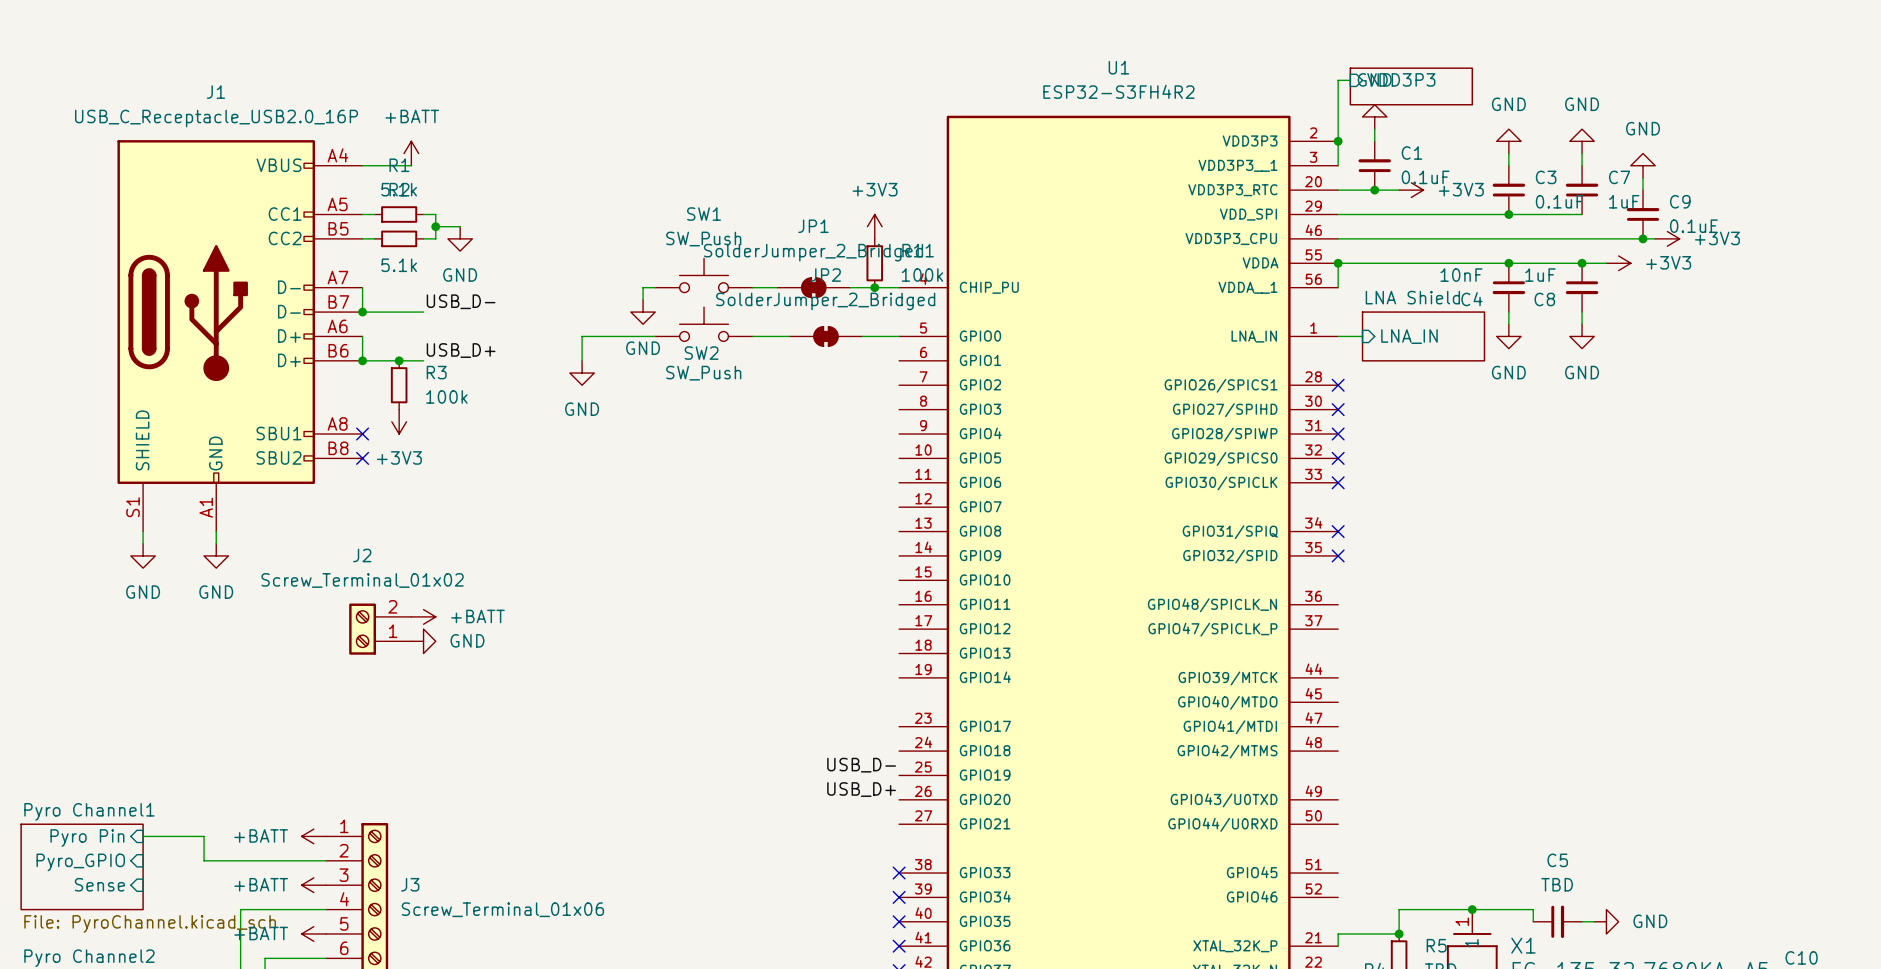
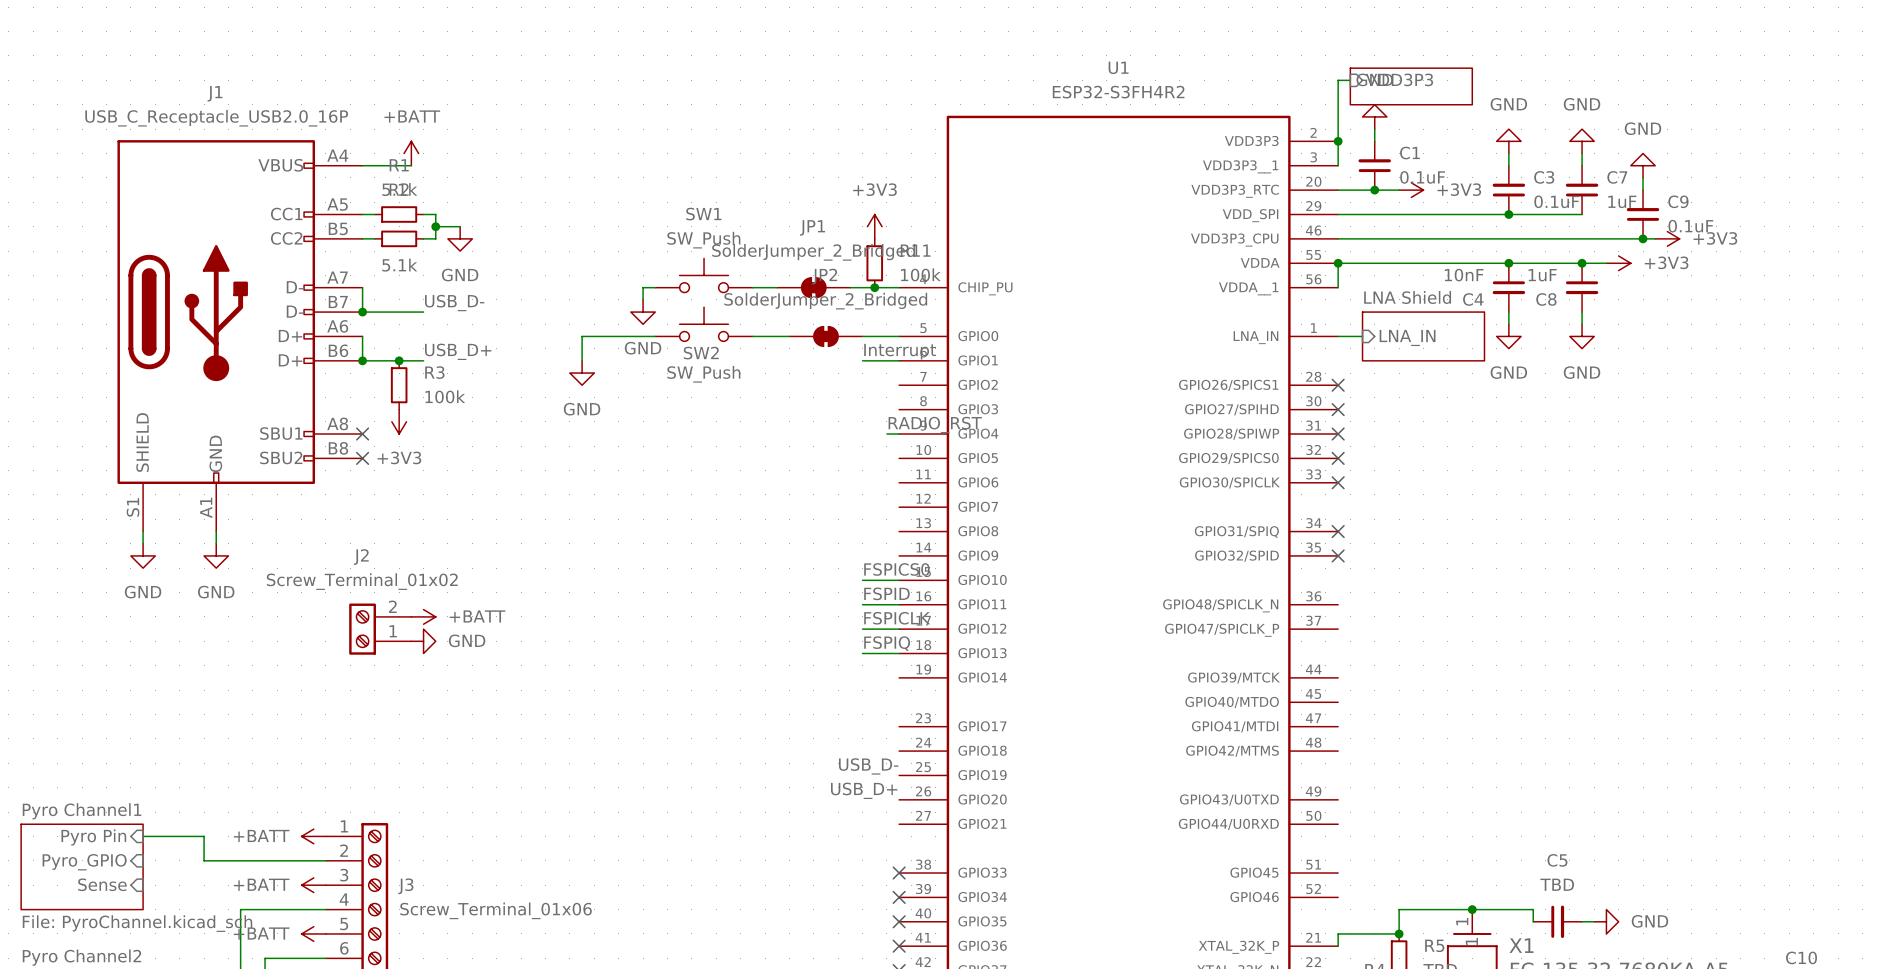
label: none -> Interrupt (900, 351)
wire: none -> (862, 360) (899, 360)
label: none -> RADIO_RST (935, 424)
wire: none -> (886, 434) (899, 434)
label: none -> FSPICS0 (896, 569)
wire: none -> (862, 580) (899, 580)
label: none -> FSPID (886, 593)
wire: none -> (862, 604) (899, 604)
label: none -> FSPICLK (897, 618)
wire: none -> (862, 629) (899, 629)
label: none -> FSPIQ (887, 643)
wire: none -> (862, 653) (899, 653)

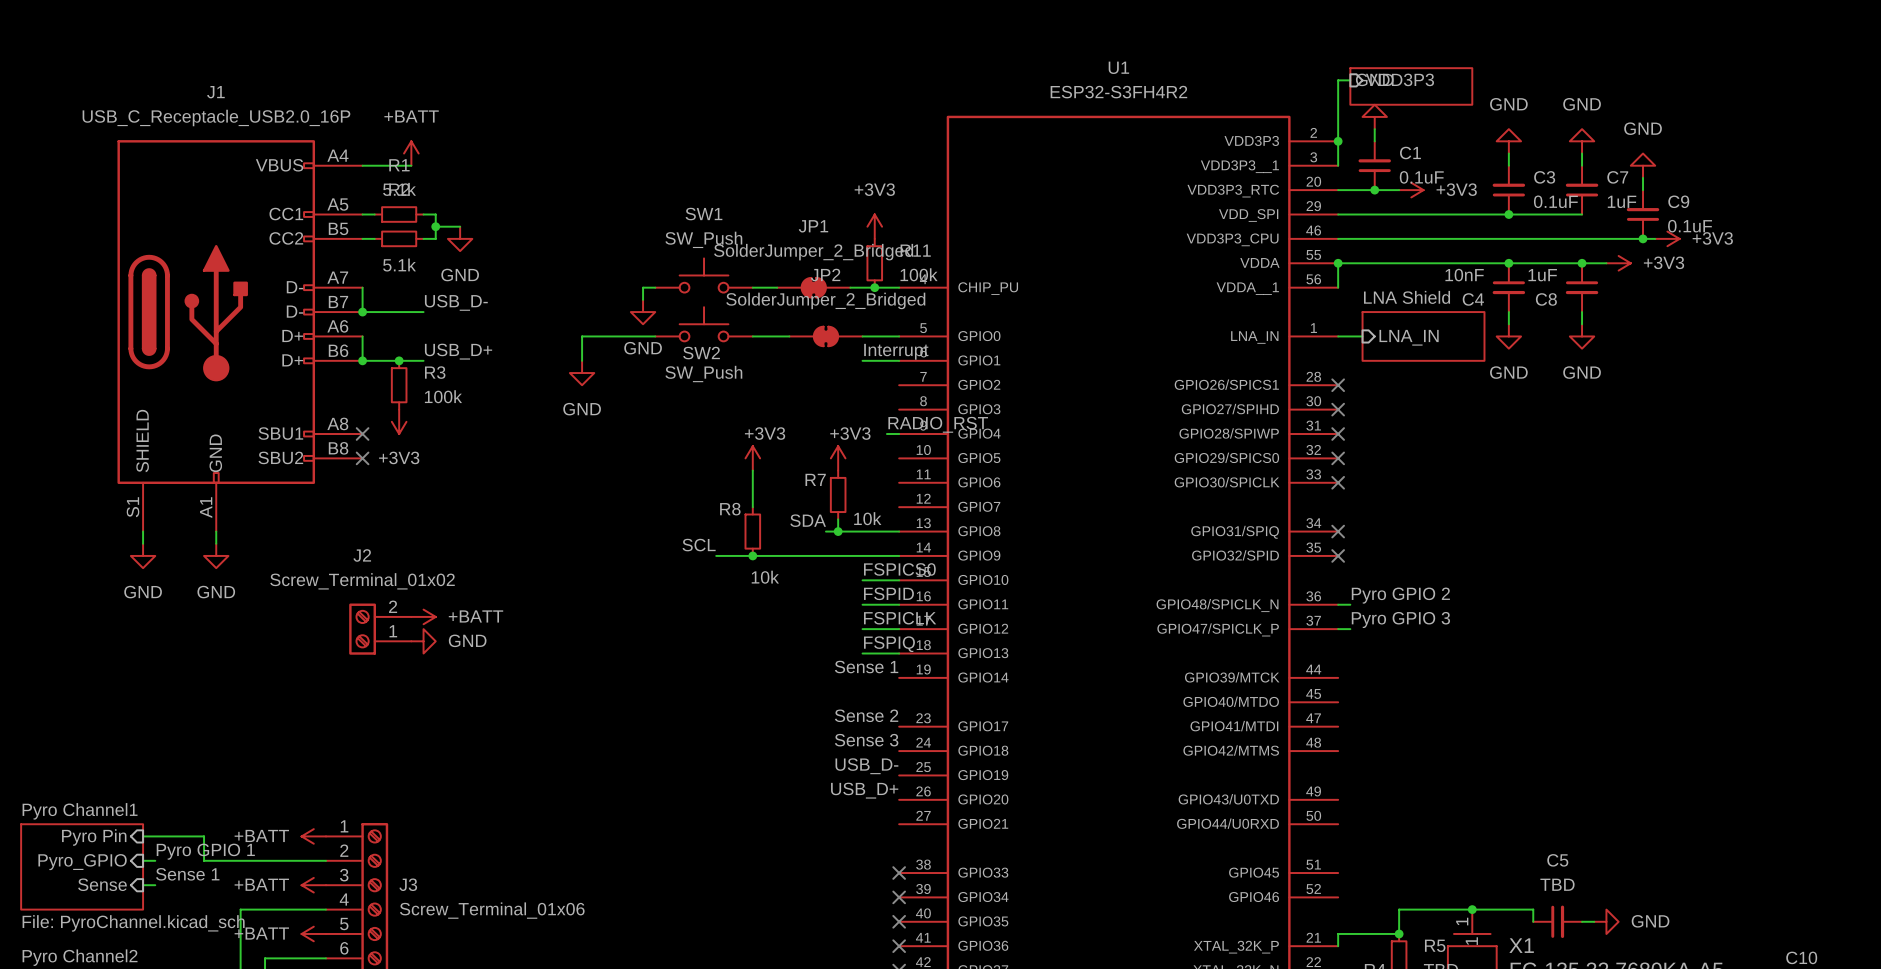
power symbol: none -> +3V3 (752, 458)
power symbol: none -> +3V3 (838, 458)
wire: none -> (752, 470) (752, 507)
R7: none -> 10k (838, 494)
wire: none -> (838, 519) (838, 531)
label: none -> SDA (808, 520)
R8: none -> 10k (752, 531)
wire: none -> (825, 531) (899, 531)
junction: none -> (838, 531)
label: none -> SCL (699, 545)
wire: none -> (716, 555) (899, 555)
junction: none -> (752, 555)
label: none -> Pyro GPIO 2 (1400, 595)
wire: none -> (1338, 604) (1350, 604)
label: none -> Pyro GPIO 3 (1400, 619)
wire: none -> (1338, 629) (1350, 629)
label: none -> Sense 1 (866, 667)
label: none -> Sense 2 (866, 715)
label: none -> Sense 3 (866, 740)
label: none -> Pyro GPIO 1 (205, 851)
wire: none -> (143, 860) (155, 860)
label: none -> Sense 1 (187, 874)
wire: none -> (143, 885) (155, 885)

